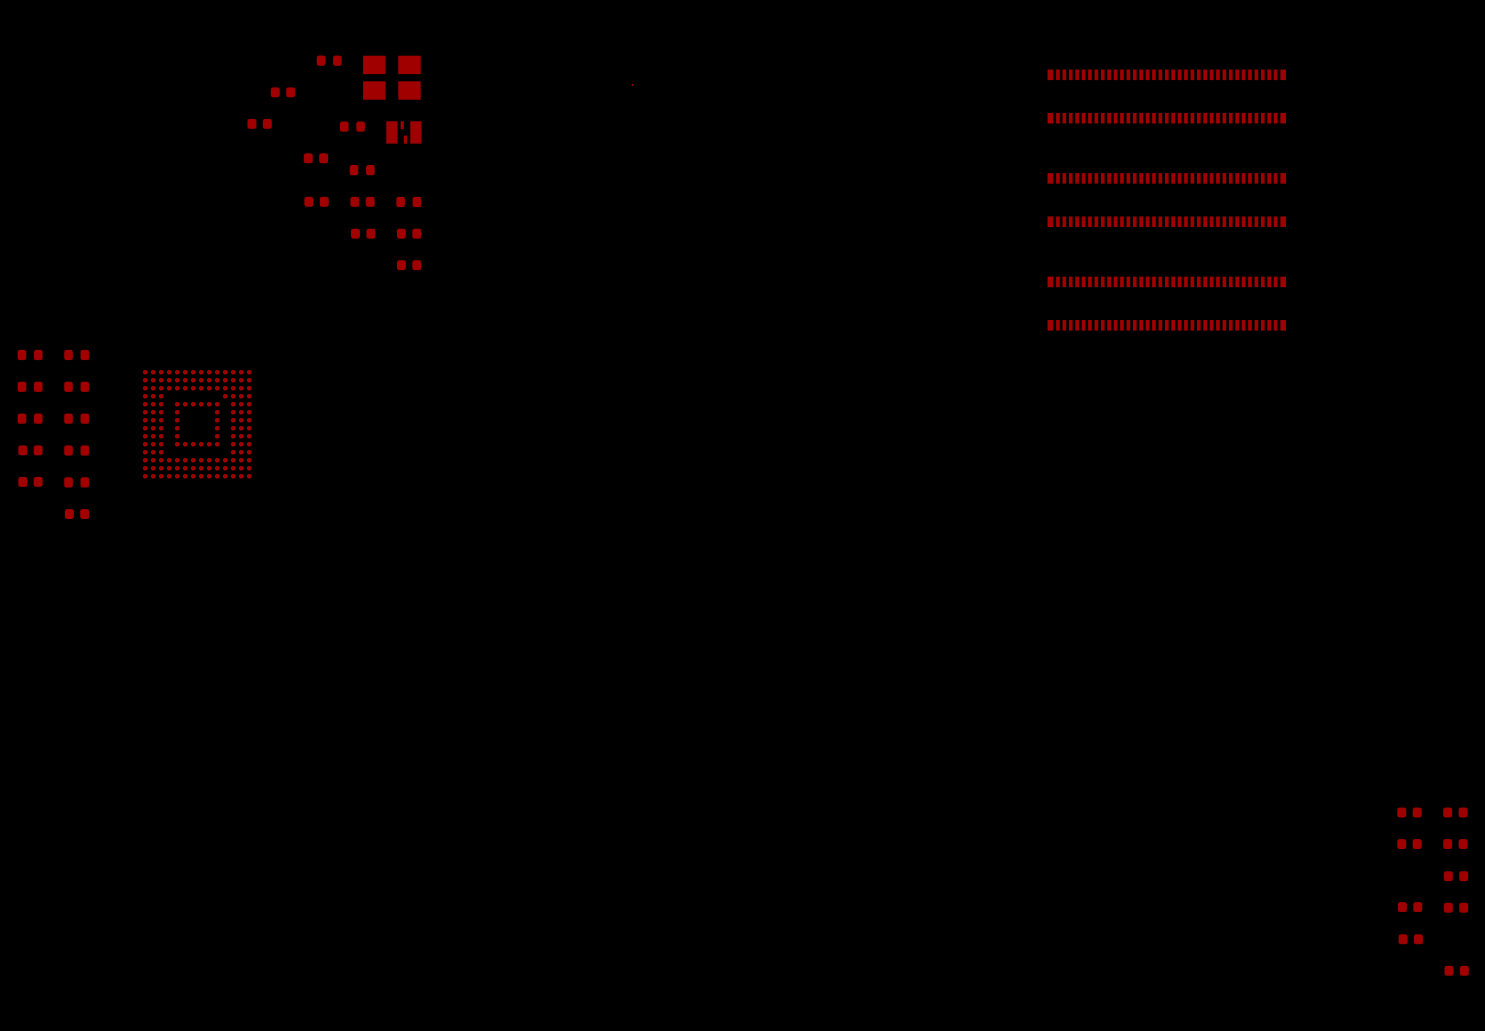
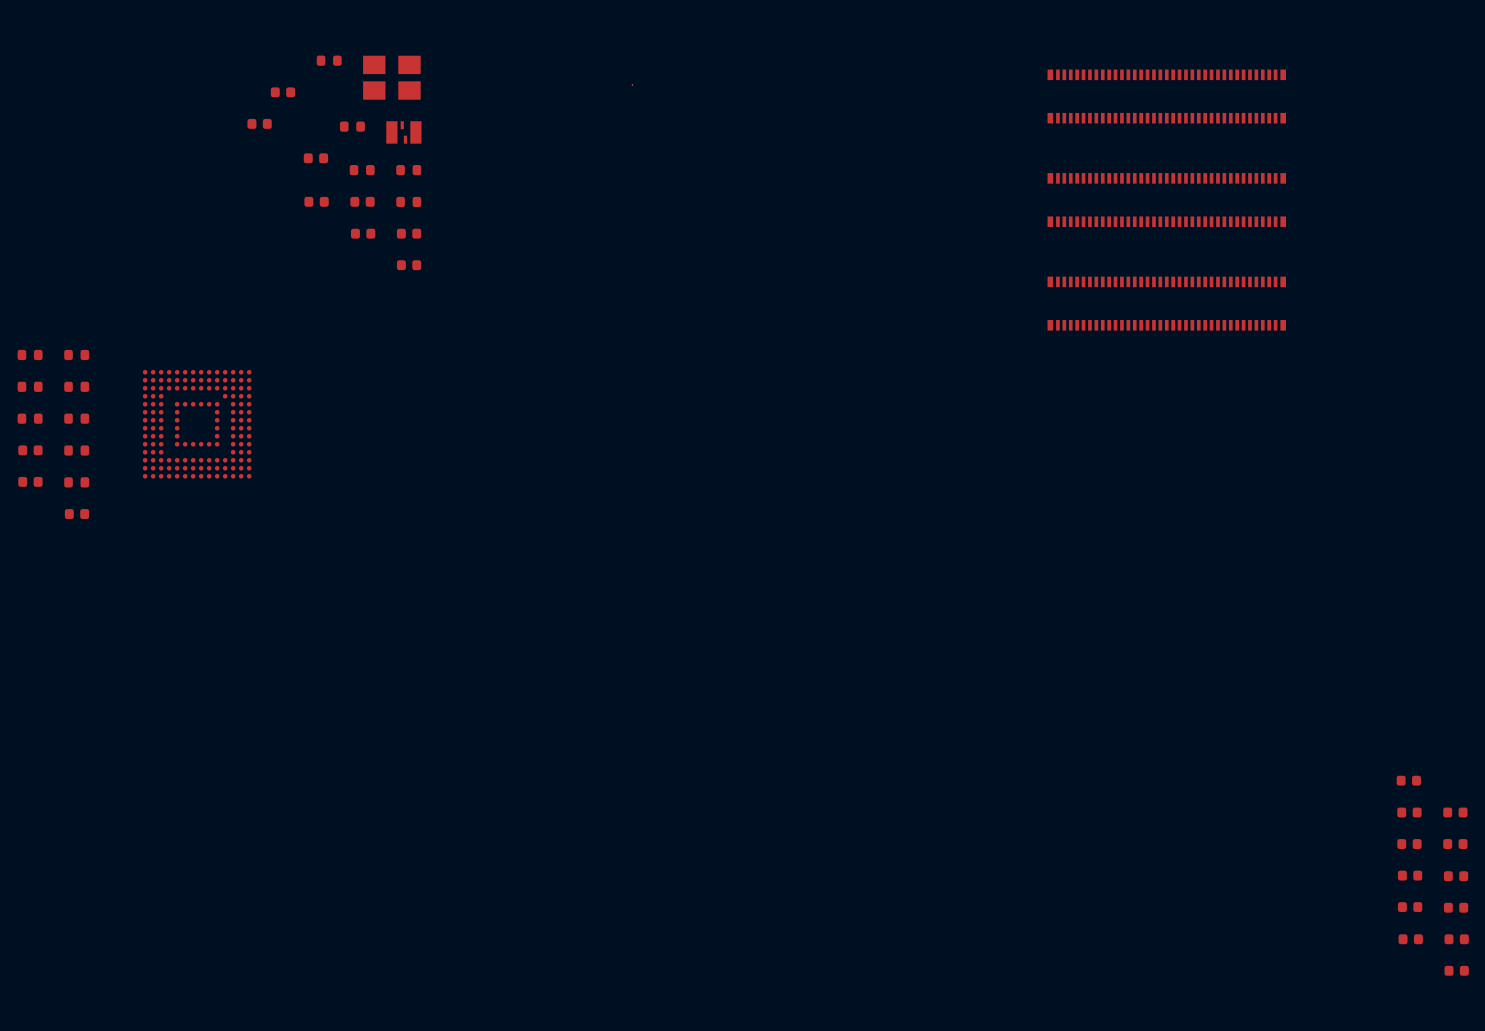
part: none -> (408, 170)
part: none -> (1408, 780)
part: none -> (1410, 875)
part: none -> (1456, 939)

